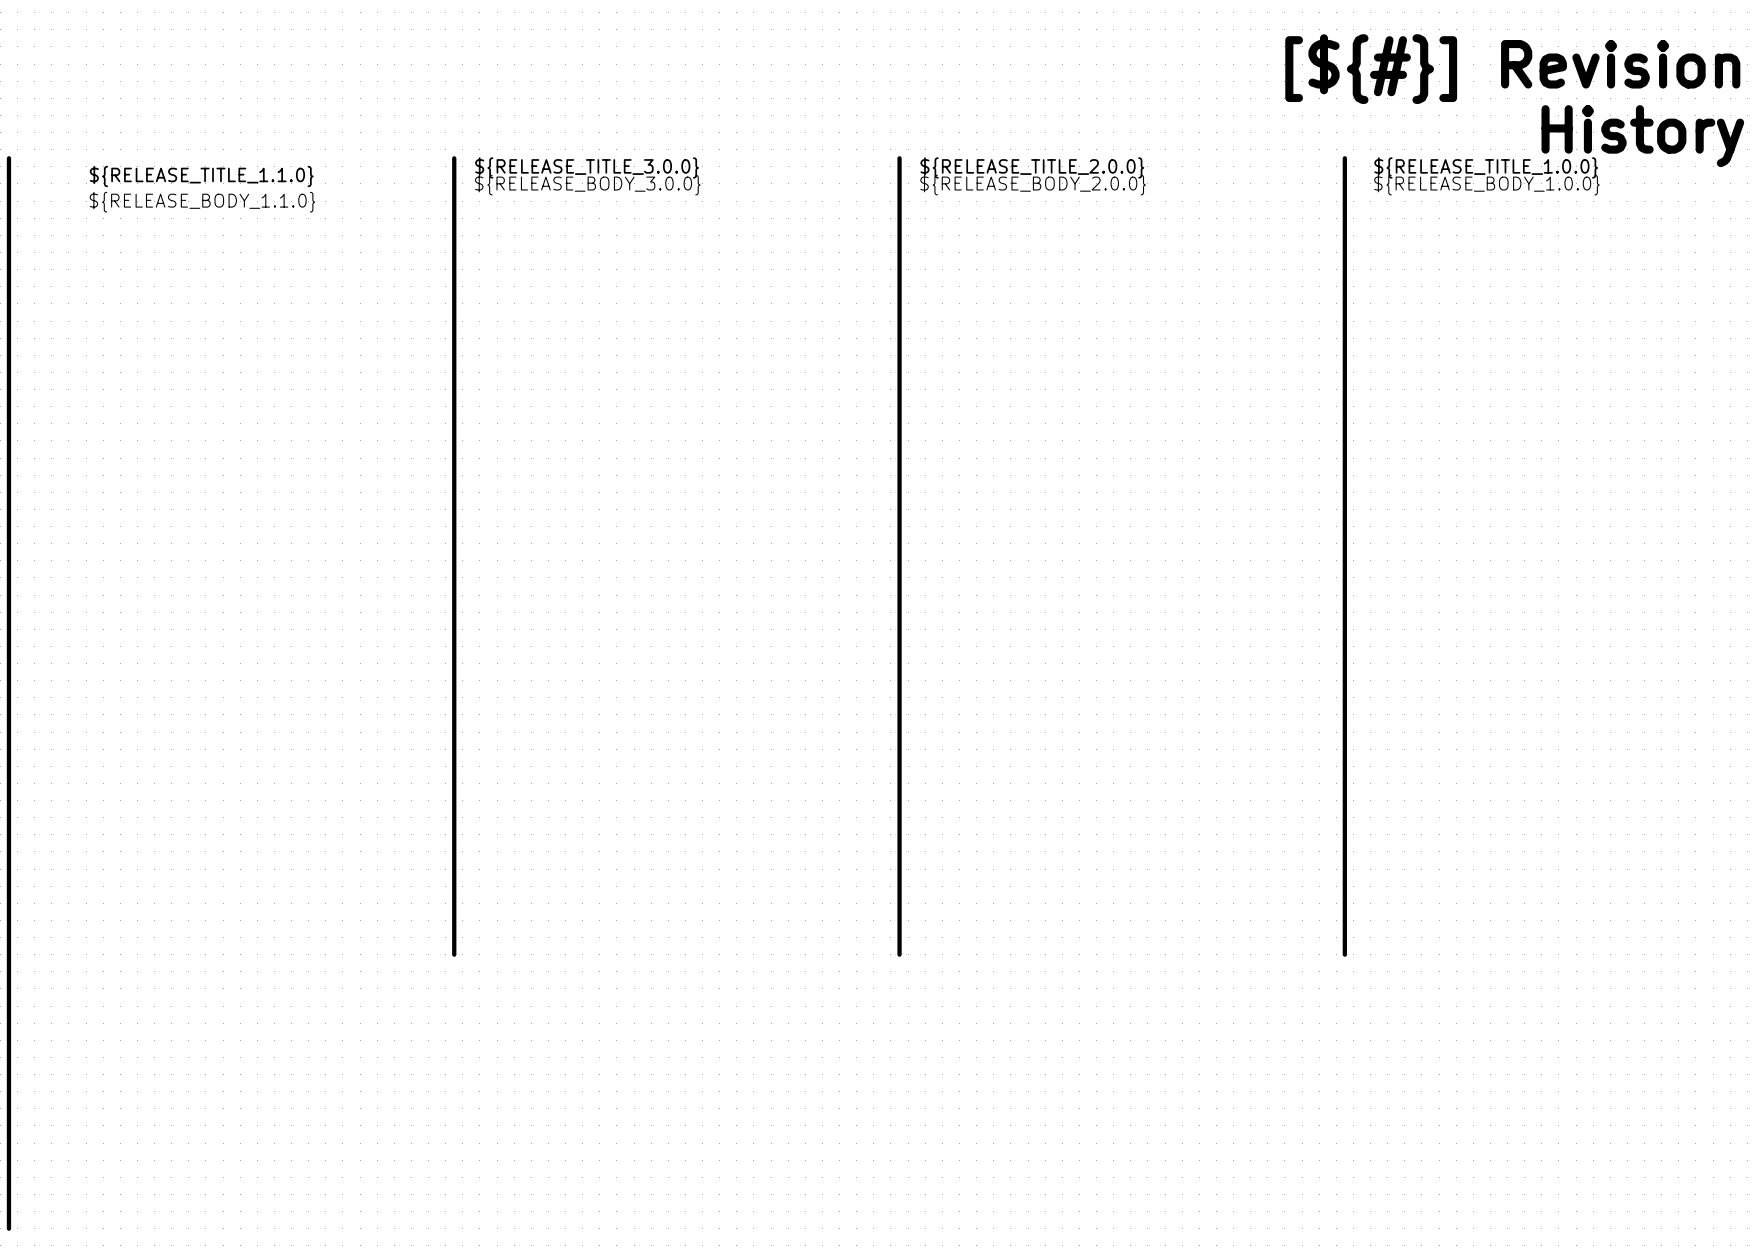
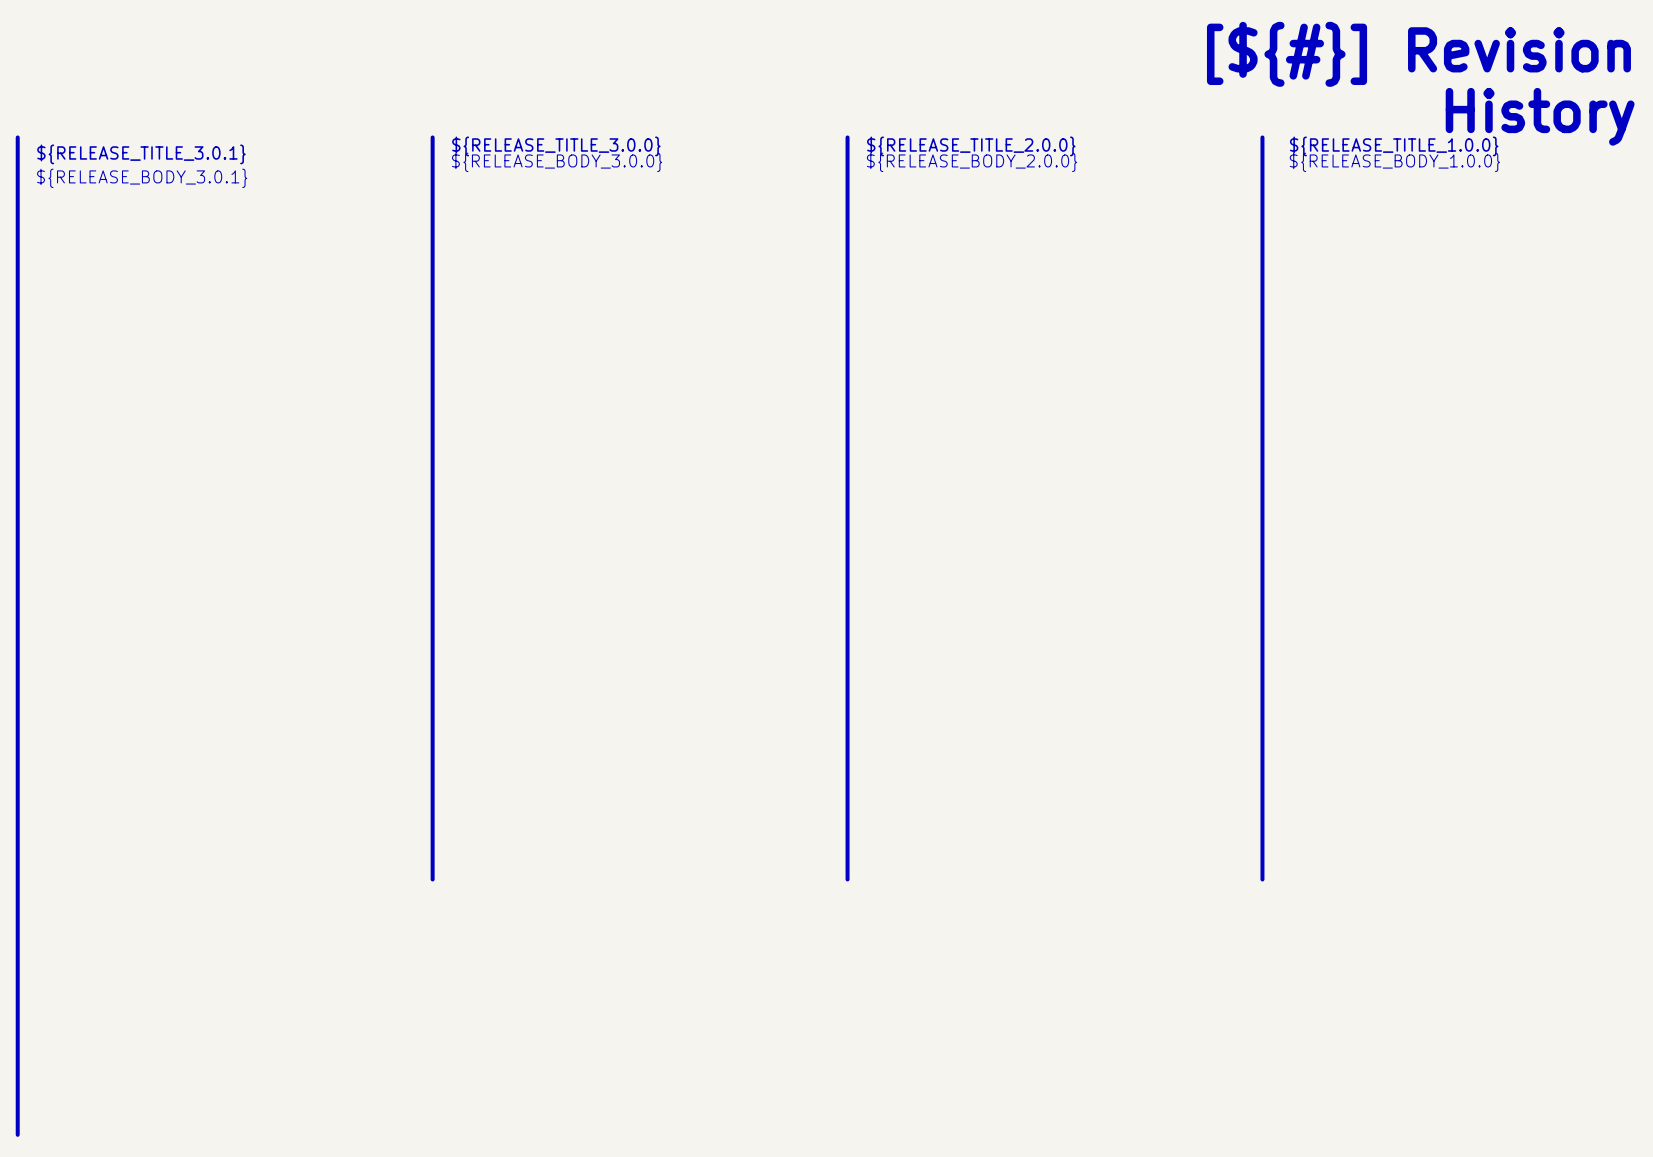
text: none -> ${RELEASE_TITLE_3.0.1} (141, 154)
text: ${RELEASE_TITLE_1.1.0} (201, 176) -> none
text: none -> ${RELEASE_BODY_3.0.1} (142, 178)
text: ${RELEASE_BODY_1.1.0} (202, 202) -> none

